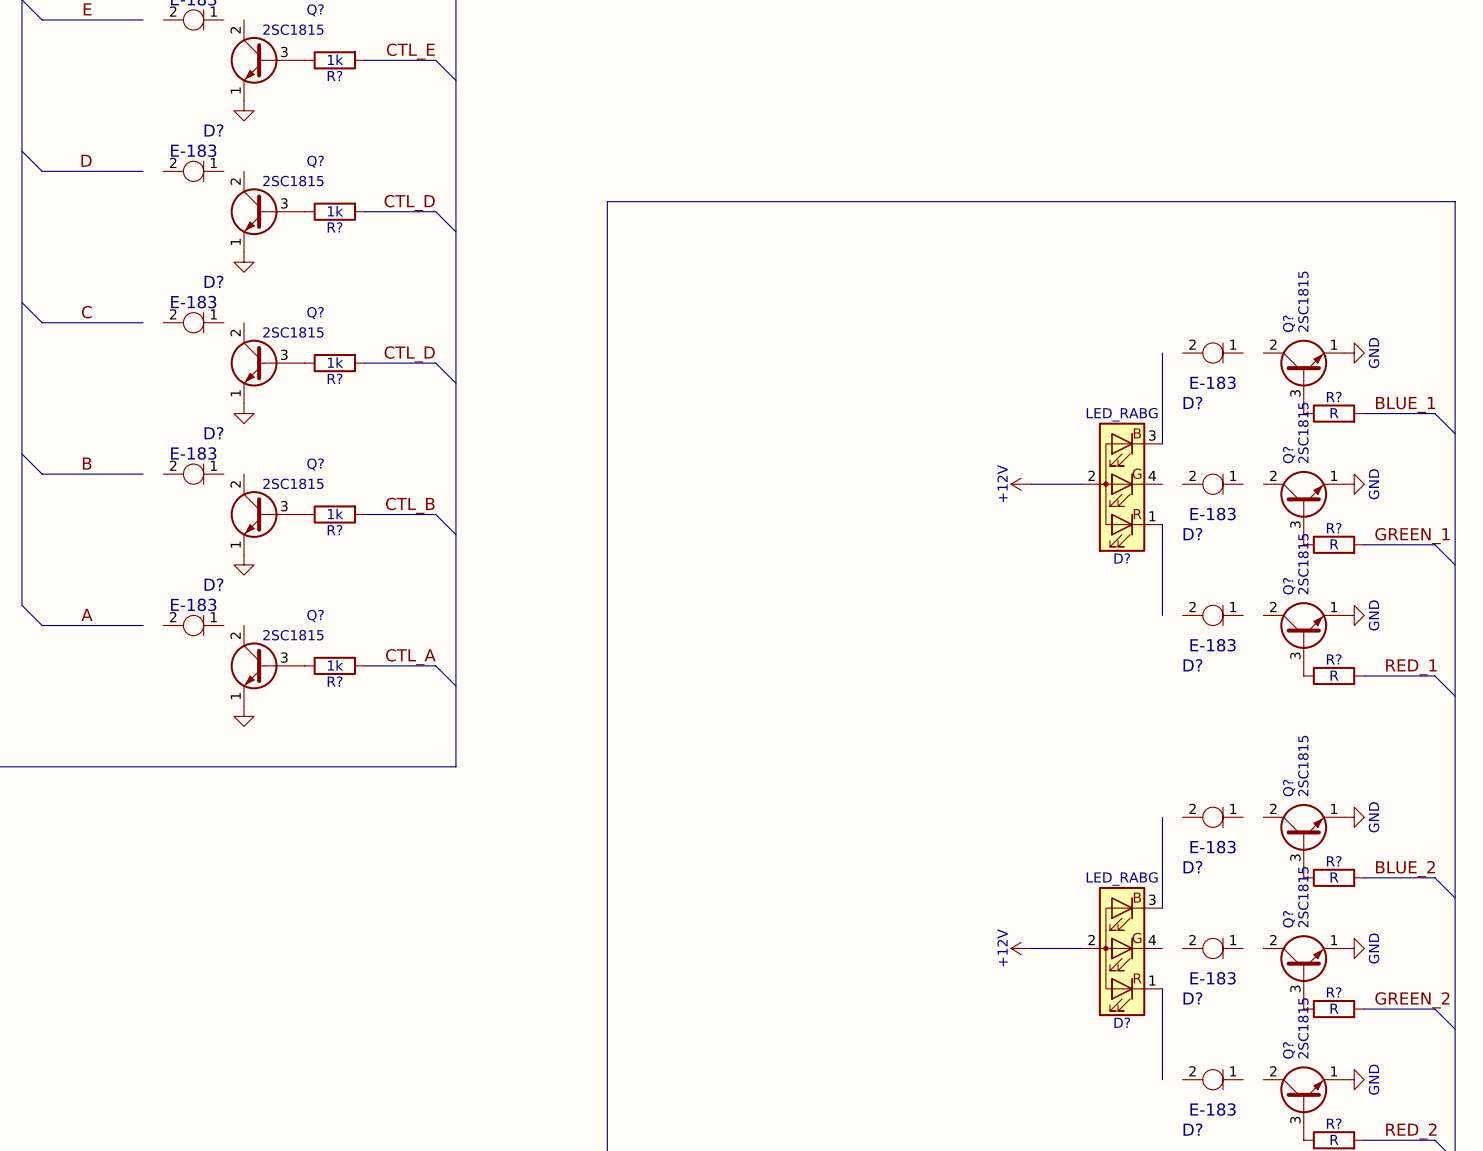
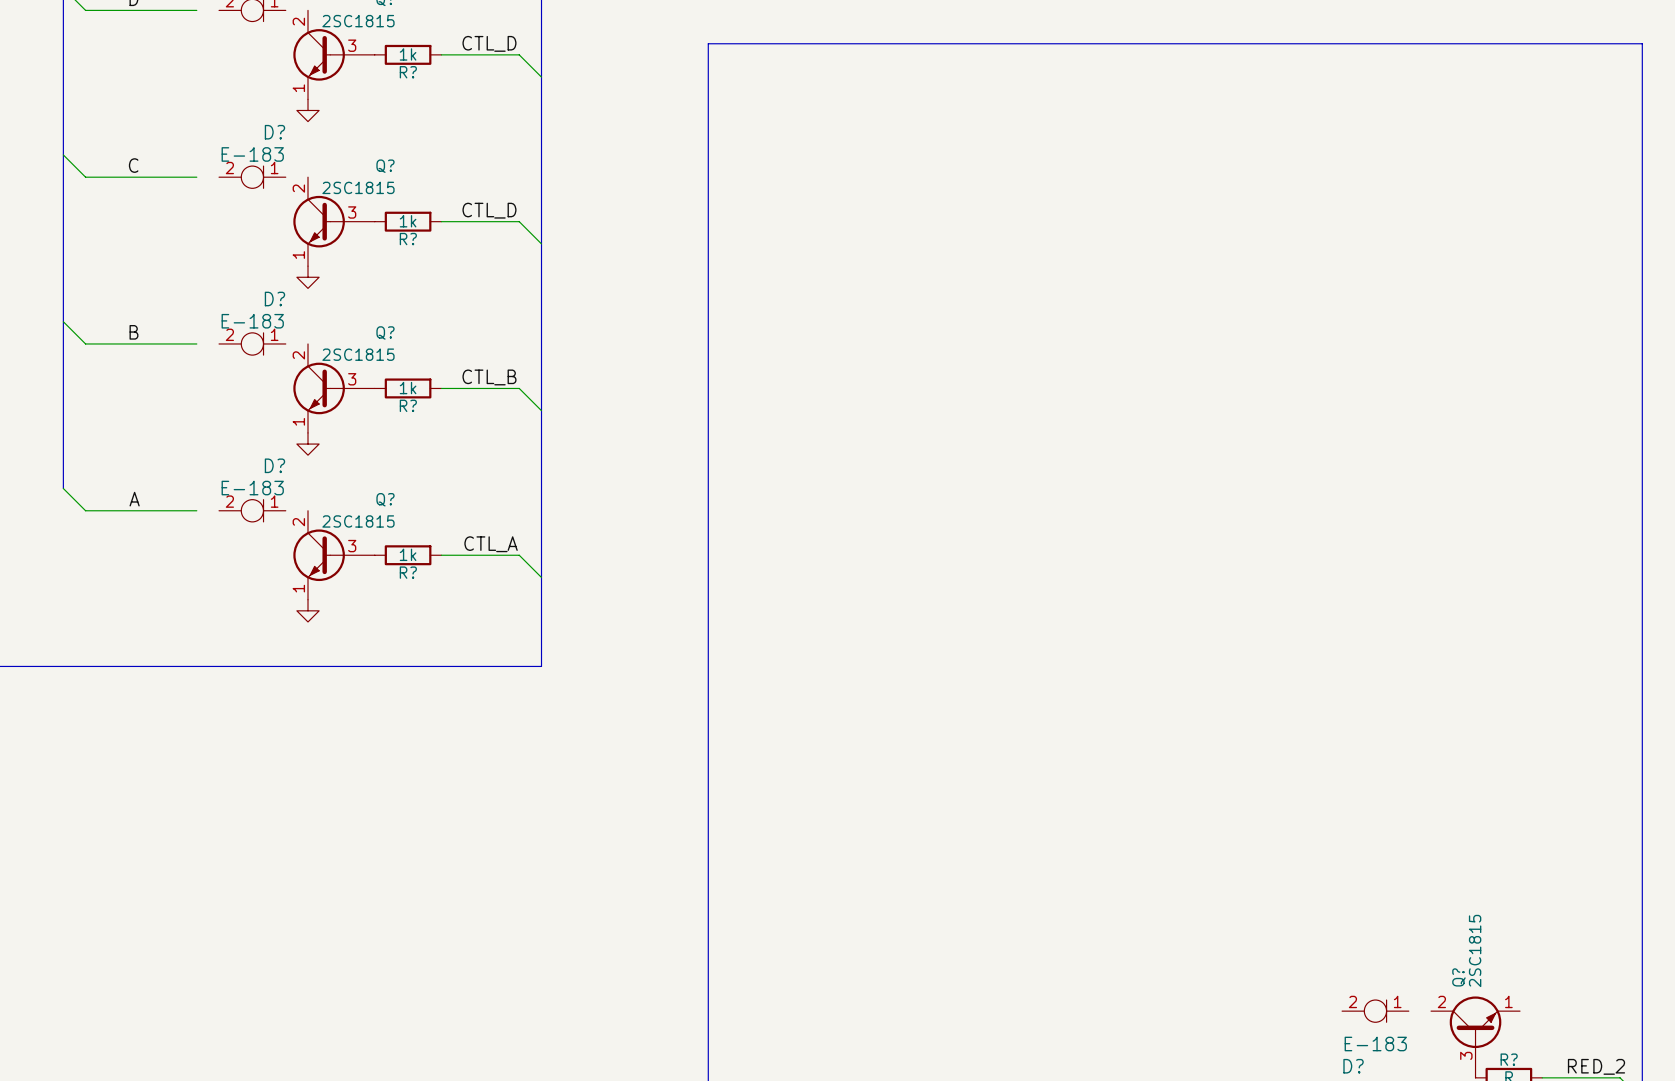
wire: (1162, 353) (1162, 443) -> none
D?: E-183 (1212, 353) -> none
power symbol: GND (1354, 353) -> none
Q?: 2SC1815 (1303, 376) -> none
label: BLUE_1 (1405, 404) -> none
R?: R (1334, 413) -> none
wire: (1364, 413) (1434, 413) (1455, 433) -> none
power symbol: +12V (1021, 484) -> none
wire: (1031, 484) (1081, 484) -> none
D?: E-183 (1212, 484) -> none
power symbol: GND (1354, 484) -> none
D?: LED_RABG (1122, 487) -> none
Q?: 2SC1815 (1303, 507) -> none
wire: (1162, 524) (1162, 615) -> none
label: GREEN_1 (1412, 536) -> none
R?: R (1334, 544) -> none
wire: (1364, 544) (1434, 544) (1455, 564) -> none
D?: E-183 (1212, 615) -> none
power symbol: GND (1354, 615) -> none
Q?: 2SC1815 (1303, 639) -> none
label: RED_1 (1411, 667) -> none
R?: R (1334, 675) -> none
wire: (1364, 675) (1434, 675) (1455, 696) -> none
wire: (1162, 817) (1162, 908) -> none
D?: E-183 (1212, 817) -> none
power symbol: GND (1354, 817) -> none
Q?: 2SC1815 (1303, 840) -> none
label: BLUE_2 (1405, 869) -> none
R?: R (1334, 877) -> none
wire: (1364, 877) (1434, 877) (1455, 898) -> none
power symbol: +12V (1021, 948) -> none
wire: (1031, 948) (1081, 948) -> none
D?: E-183 (1212, 948) -> none
power symbol: GND (1354, 948) -> none
D?: LED_RABG (1122, 951) -> none
Q?: 2SC1815 (1303, 972) -> none
wire: (1162, 988) (1162, 1079) -> none
label: GREEN_2 (1412, 1000) -> none
R?: R (1334, 1009) -> none
wire: (1364, 1009) (1434, 1009) (1455, 1029) -> none
power symbol: GND (1354, 1079) -> none

